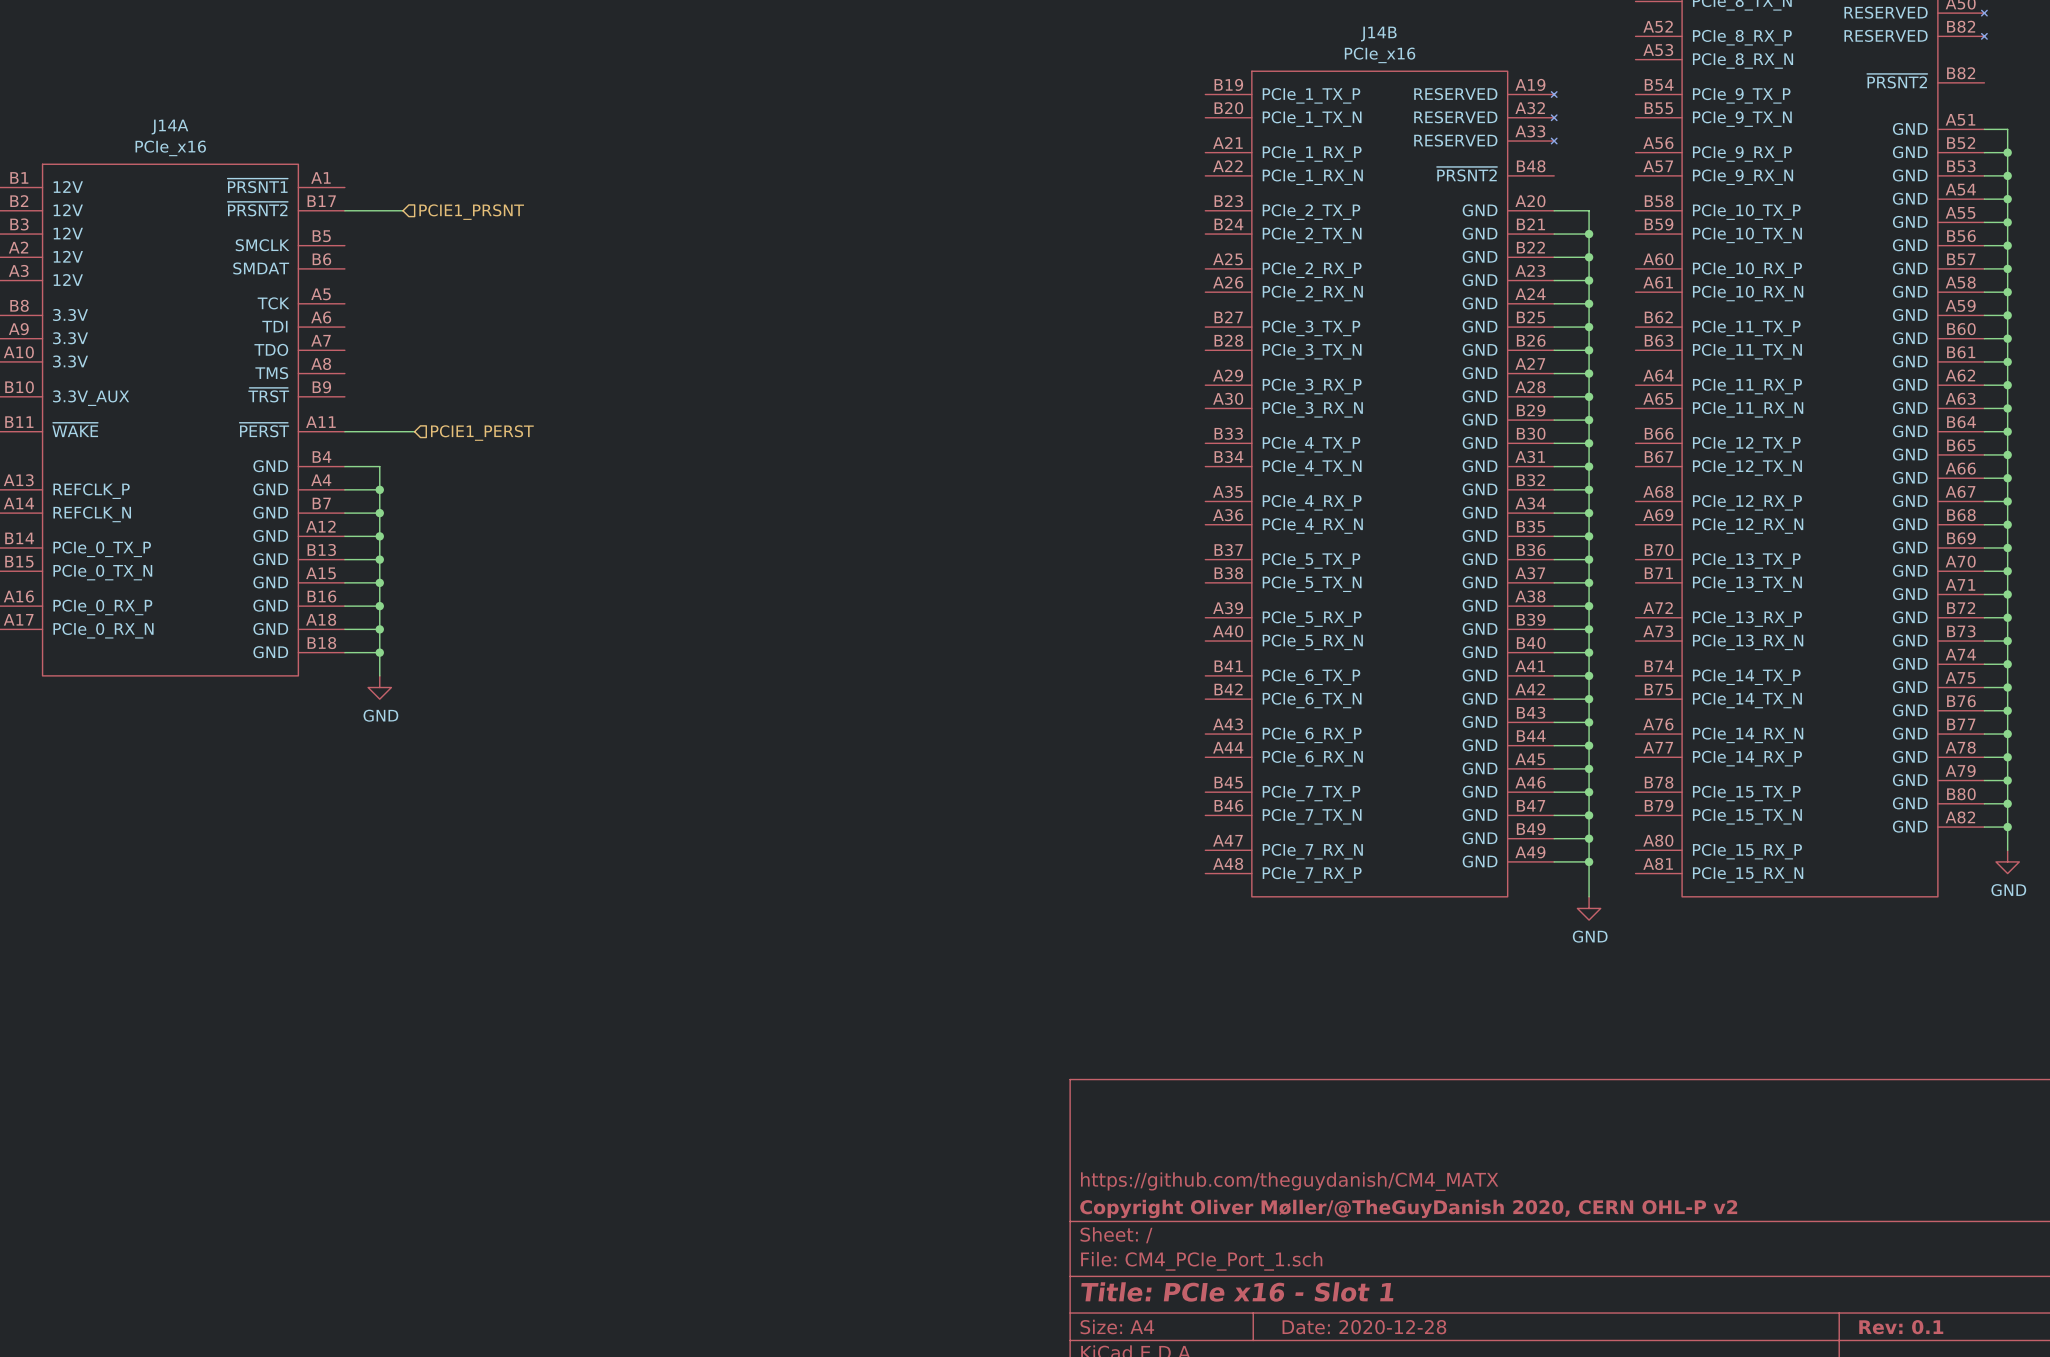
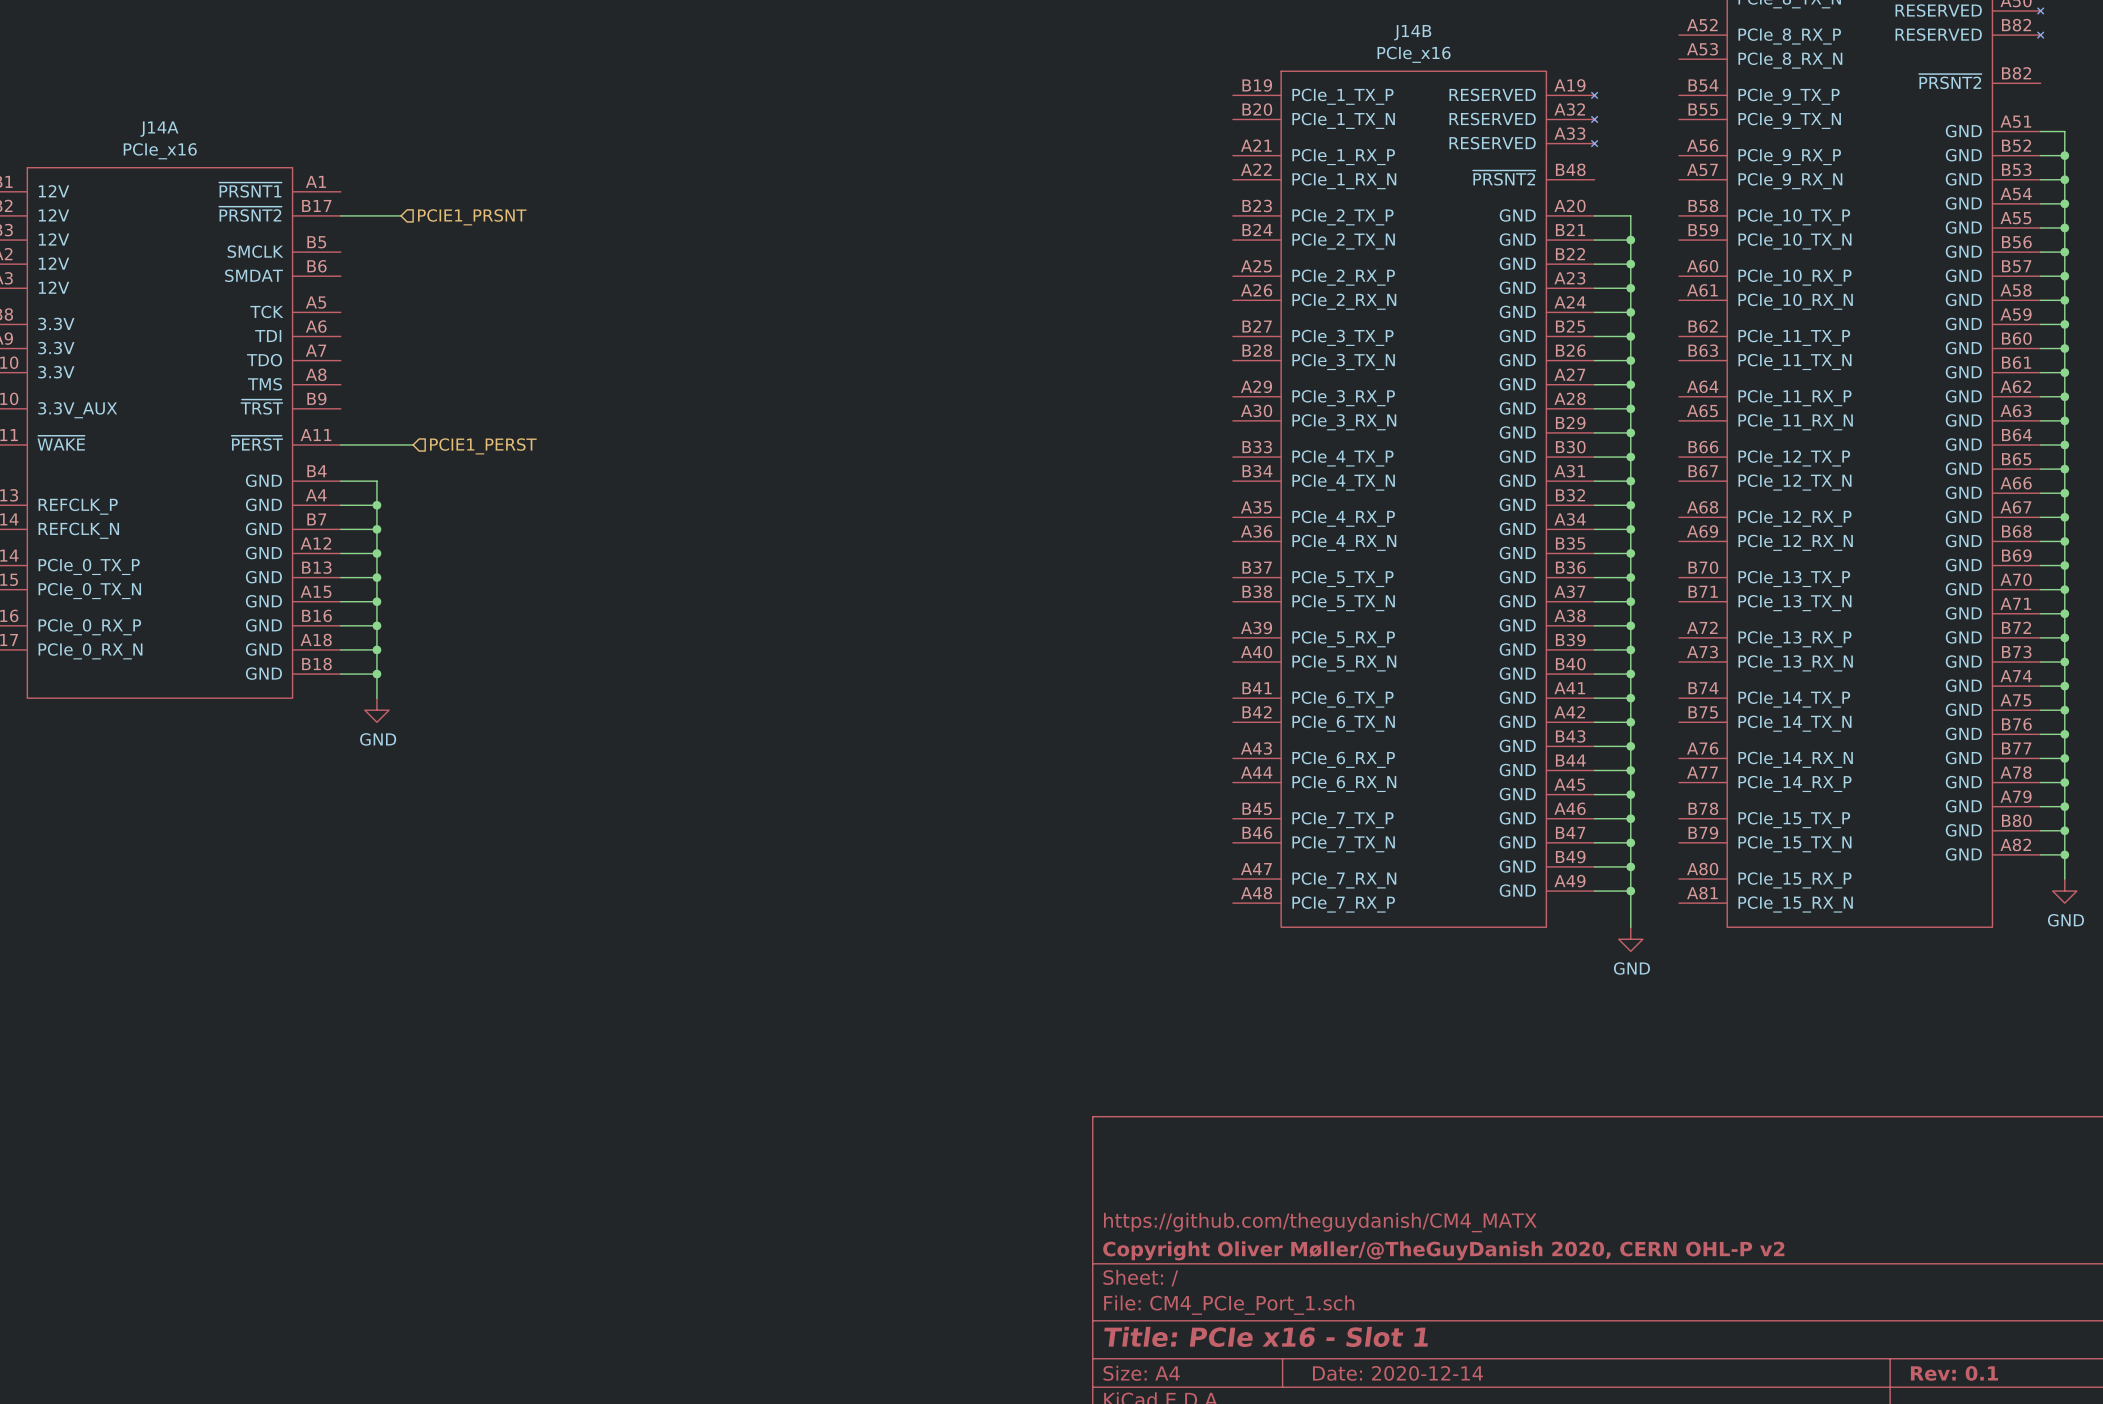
title block: Date: 2020-12-28 (1364, 1327) -> Date: 2020-12-14 (1397, 1373)

